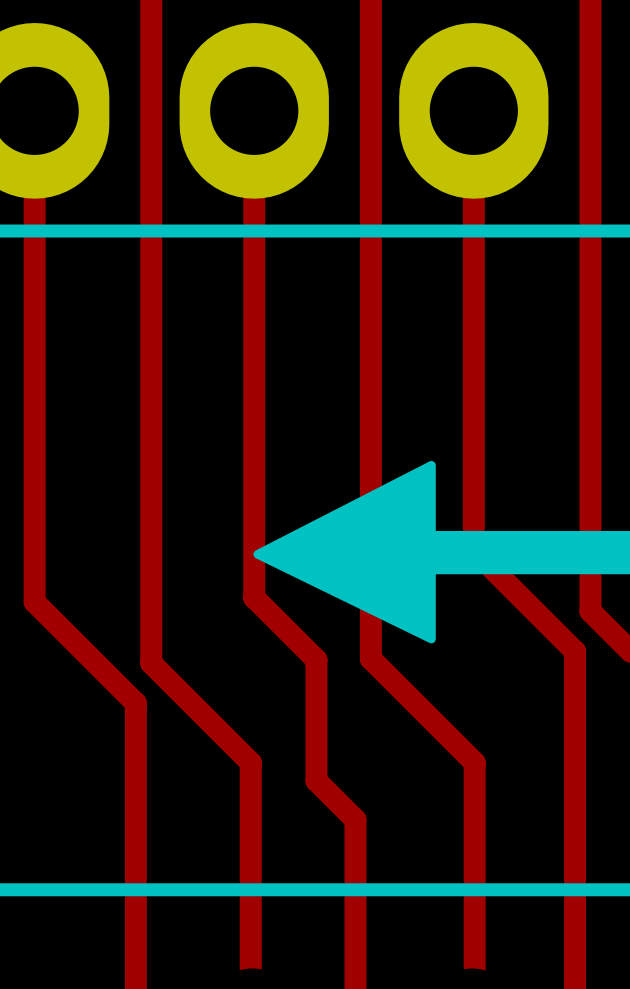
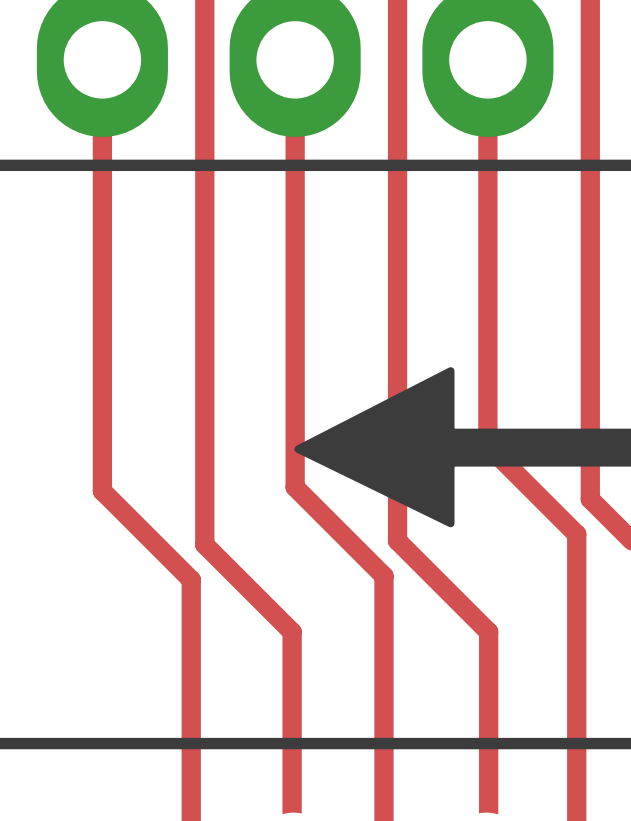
track: (316, 659) (316, 780) (355, 819) -> (349, 541) (383, 576) (383, 682)

